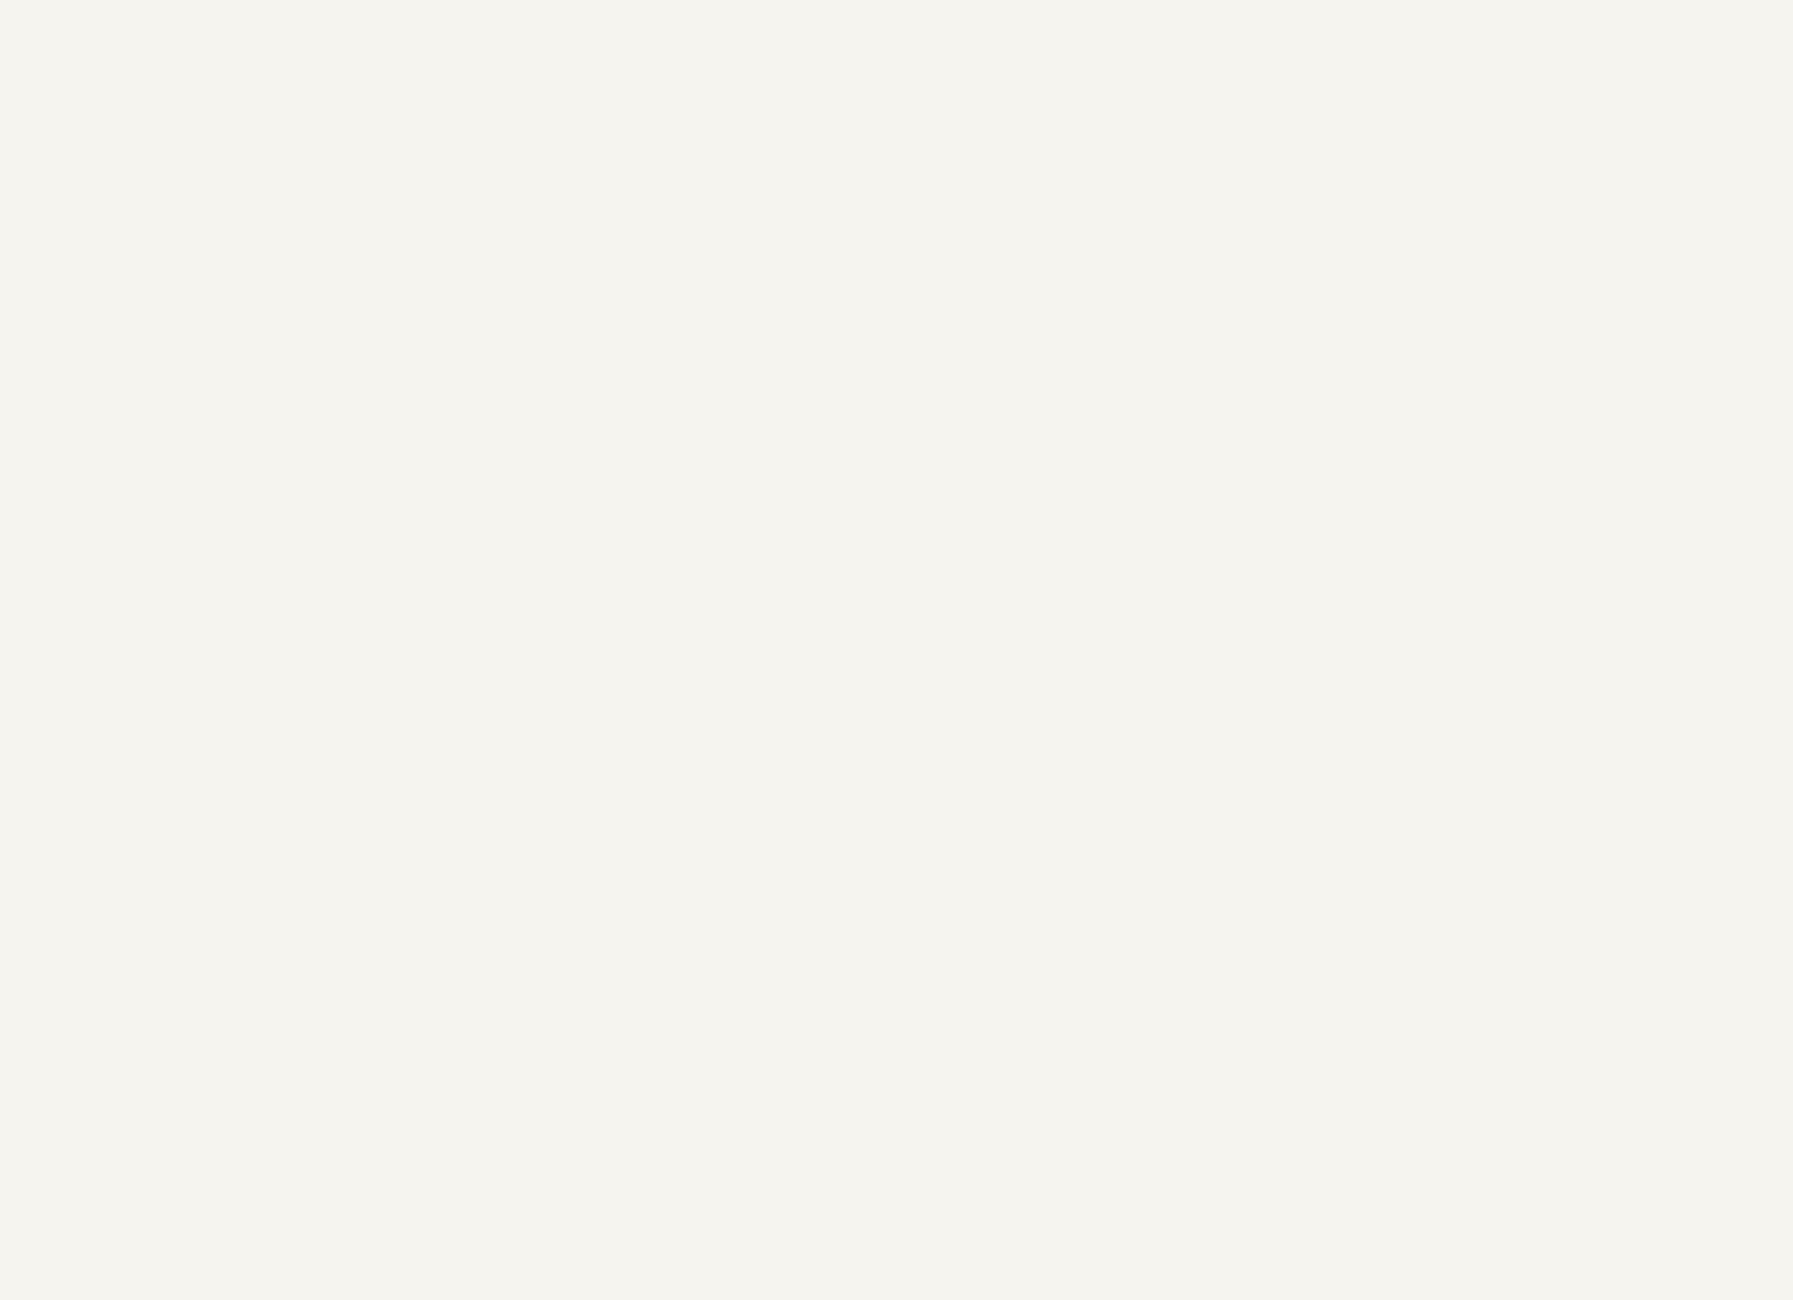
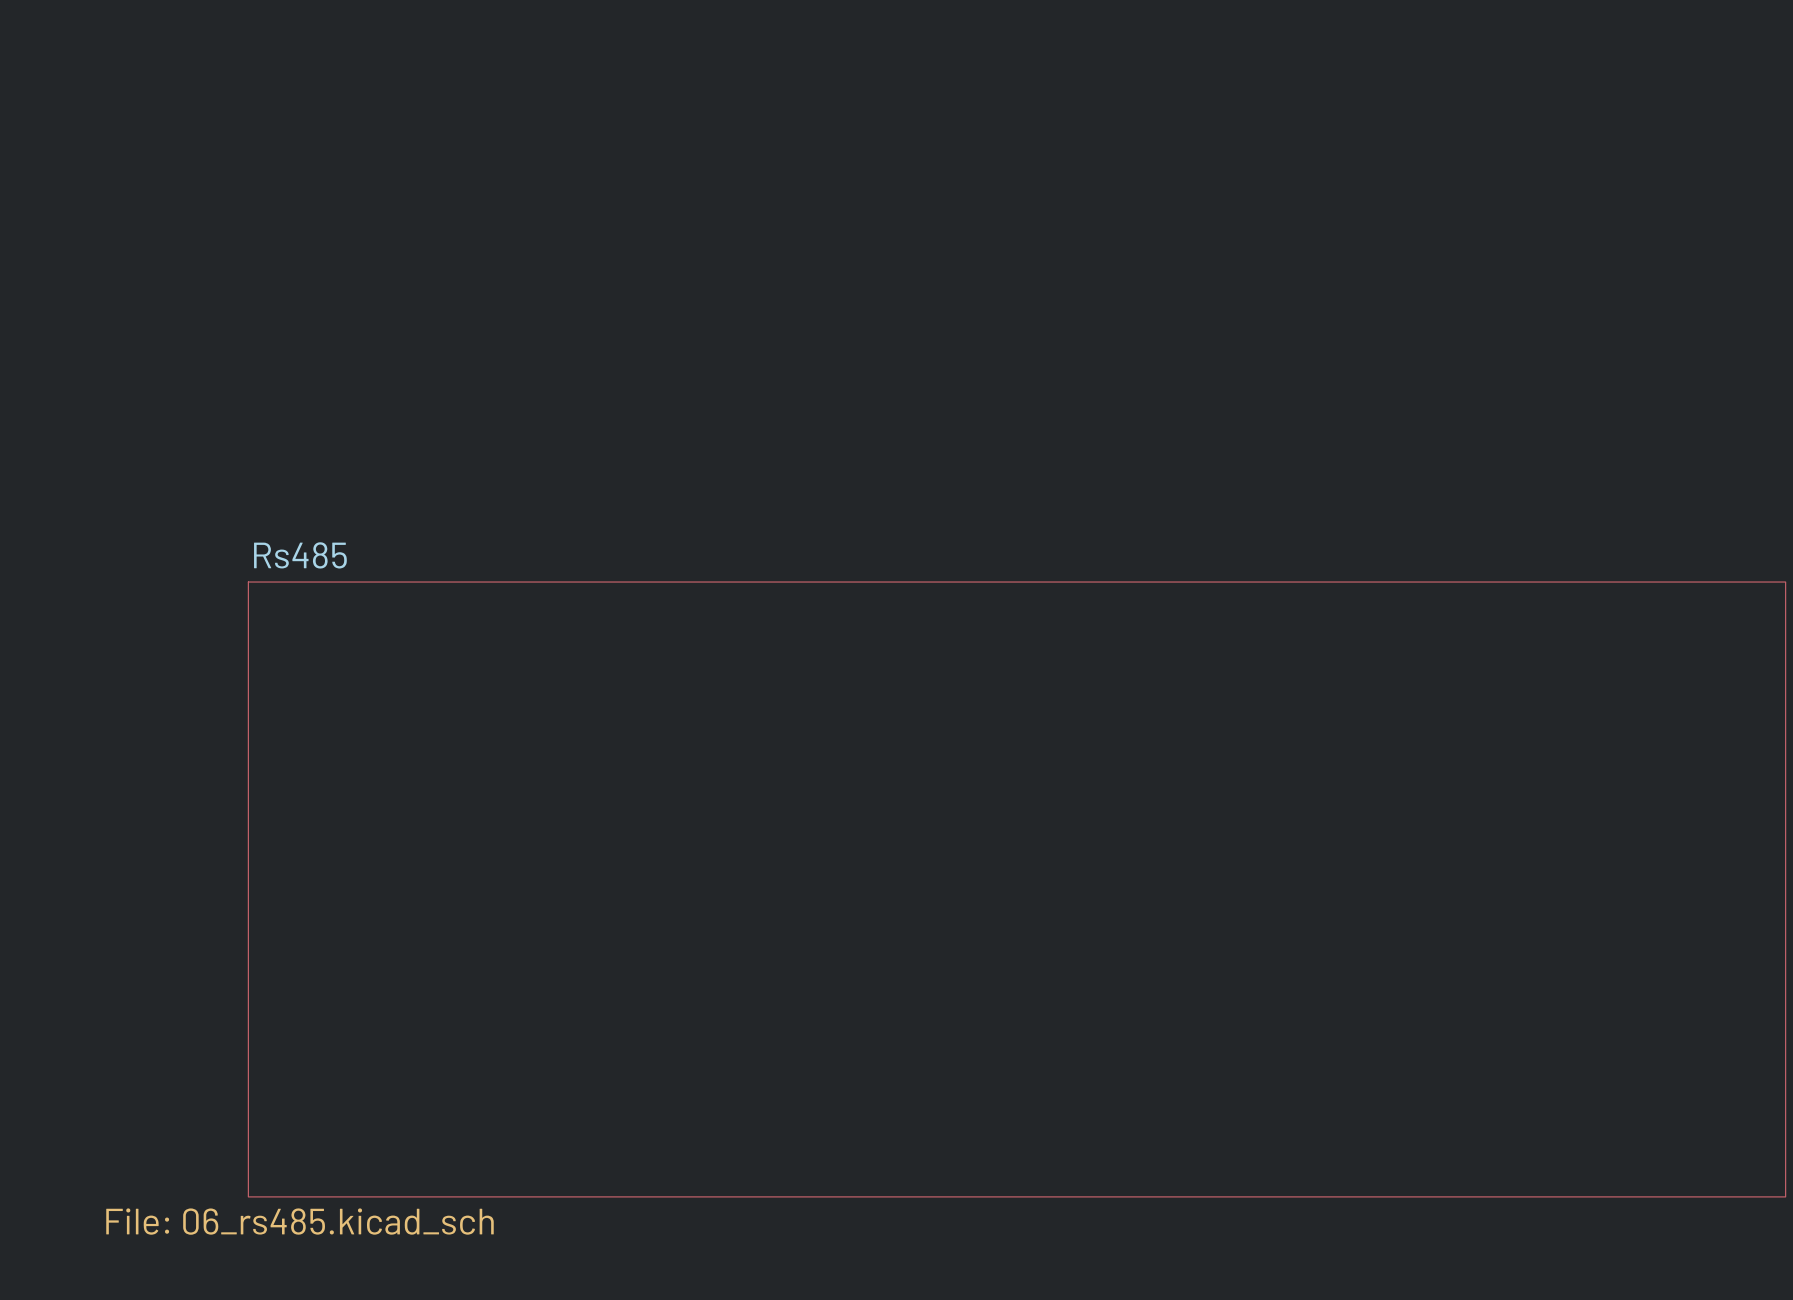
sheet Rs485: none -> File: 06_rs485.kicad_sch (1017, 889)

